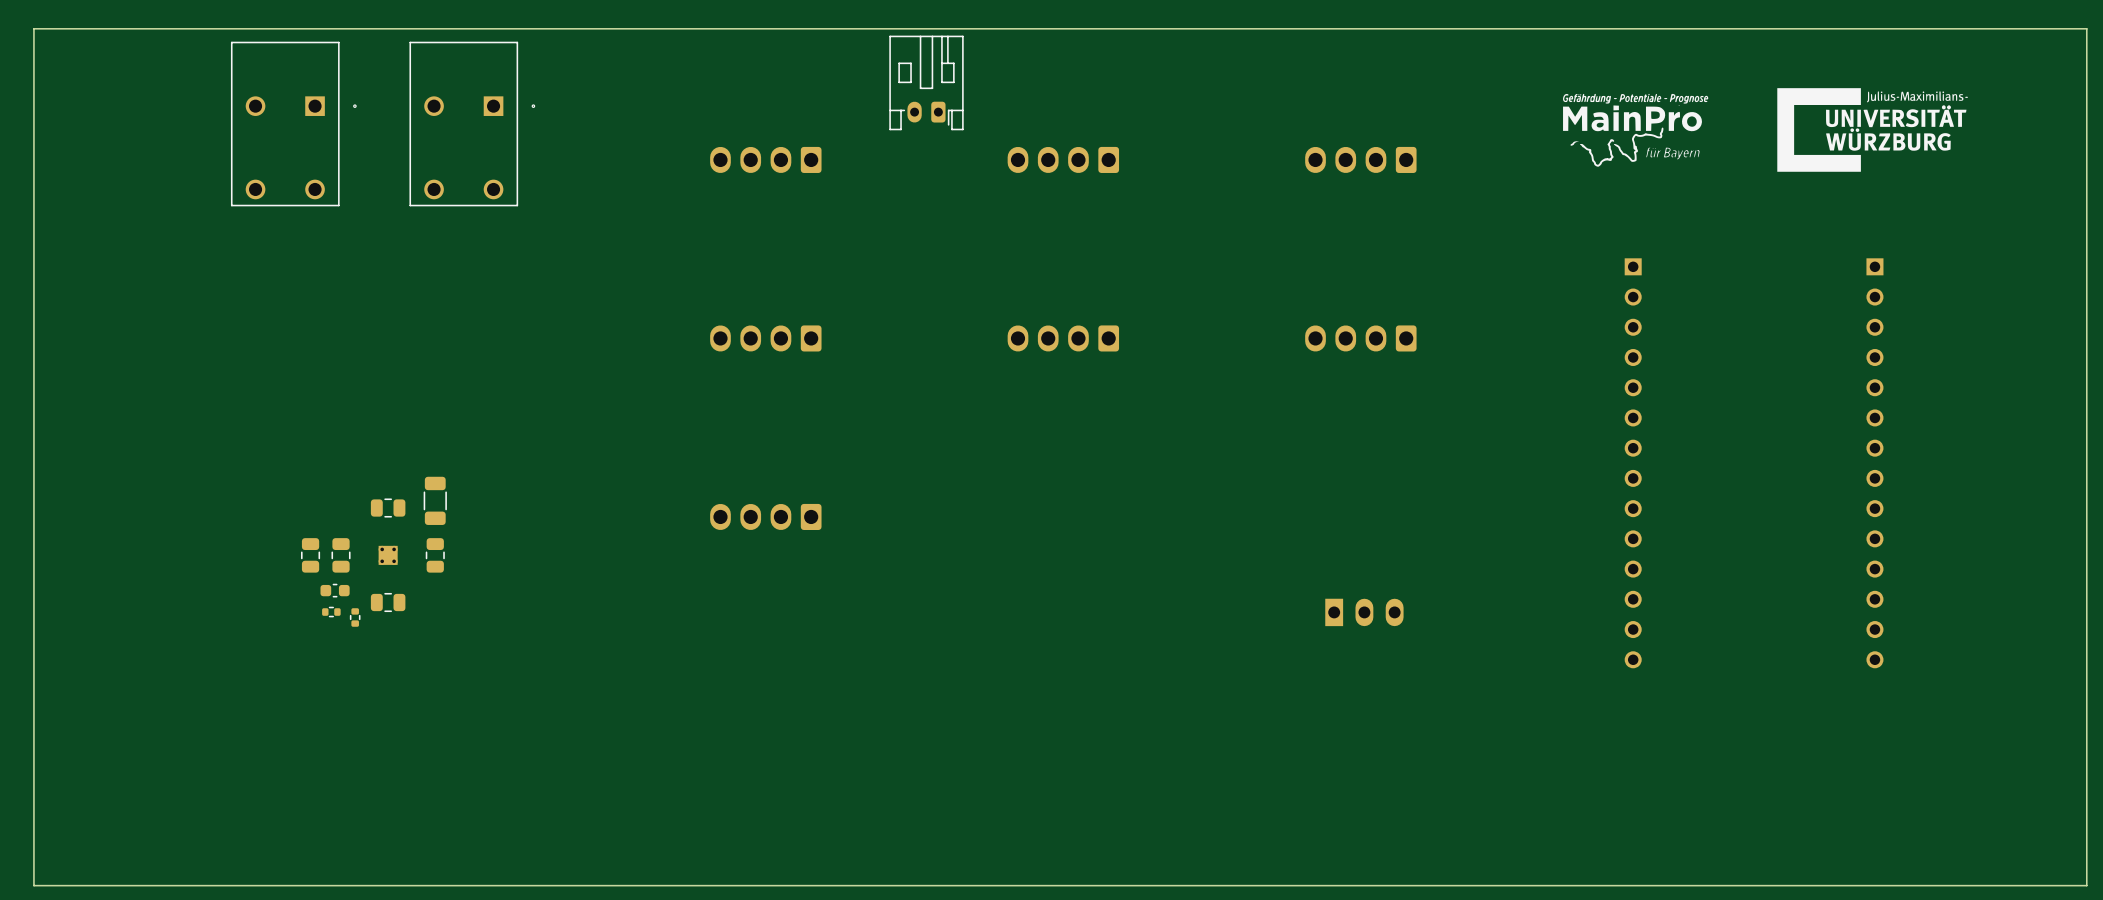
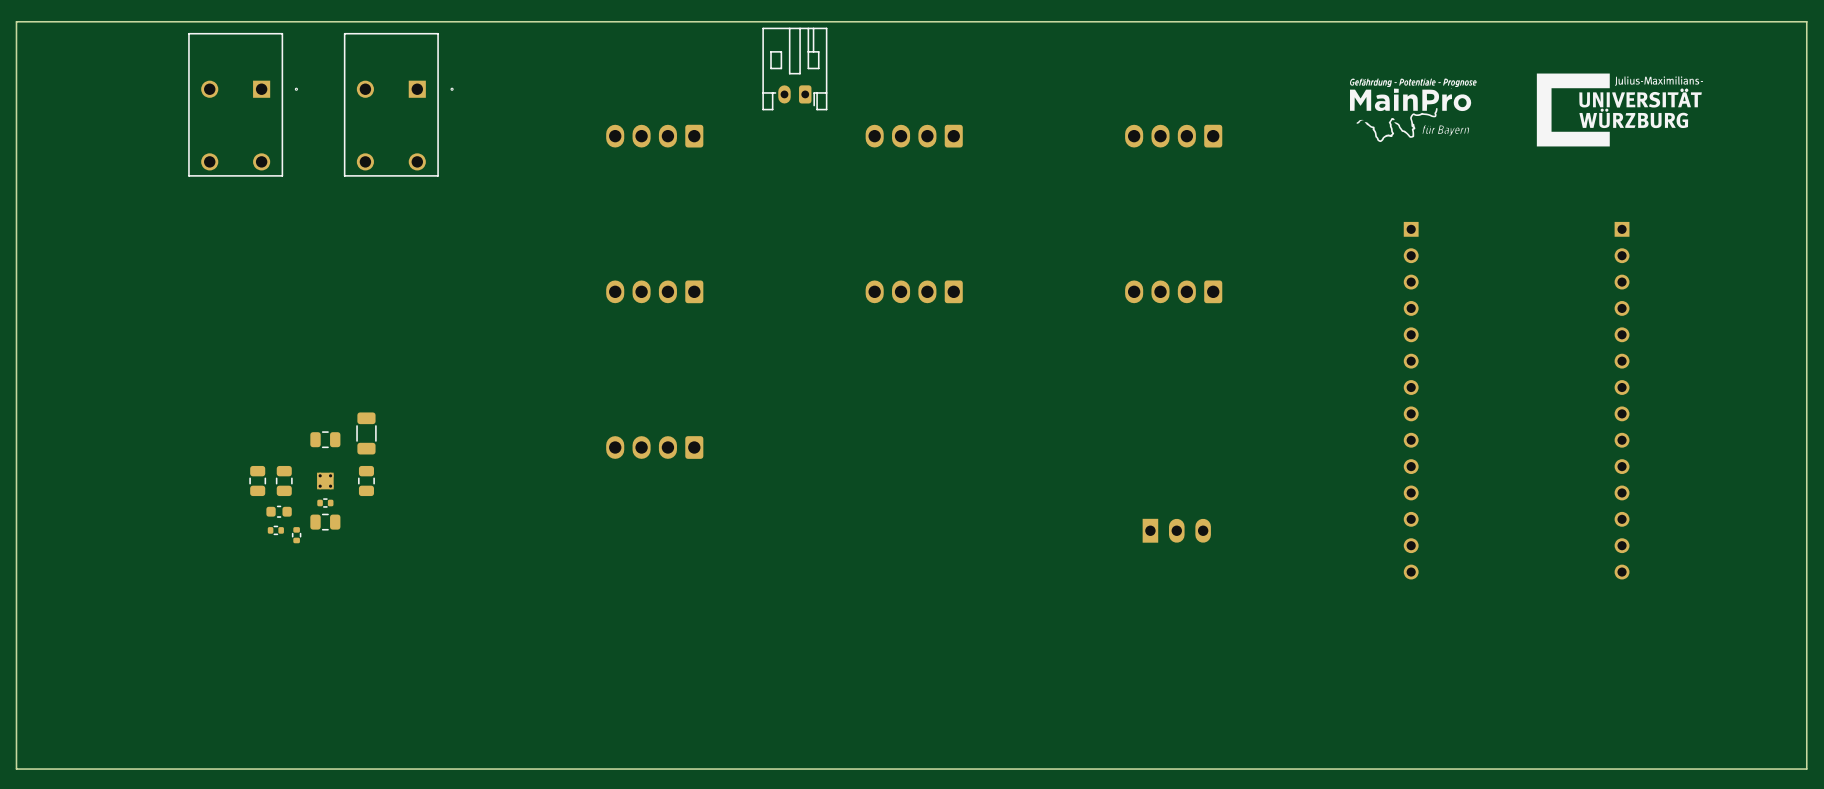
part: none -> (325, 503)

